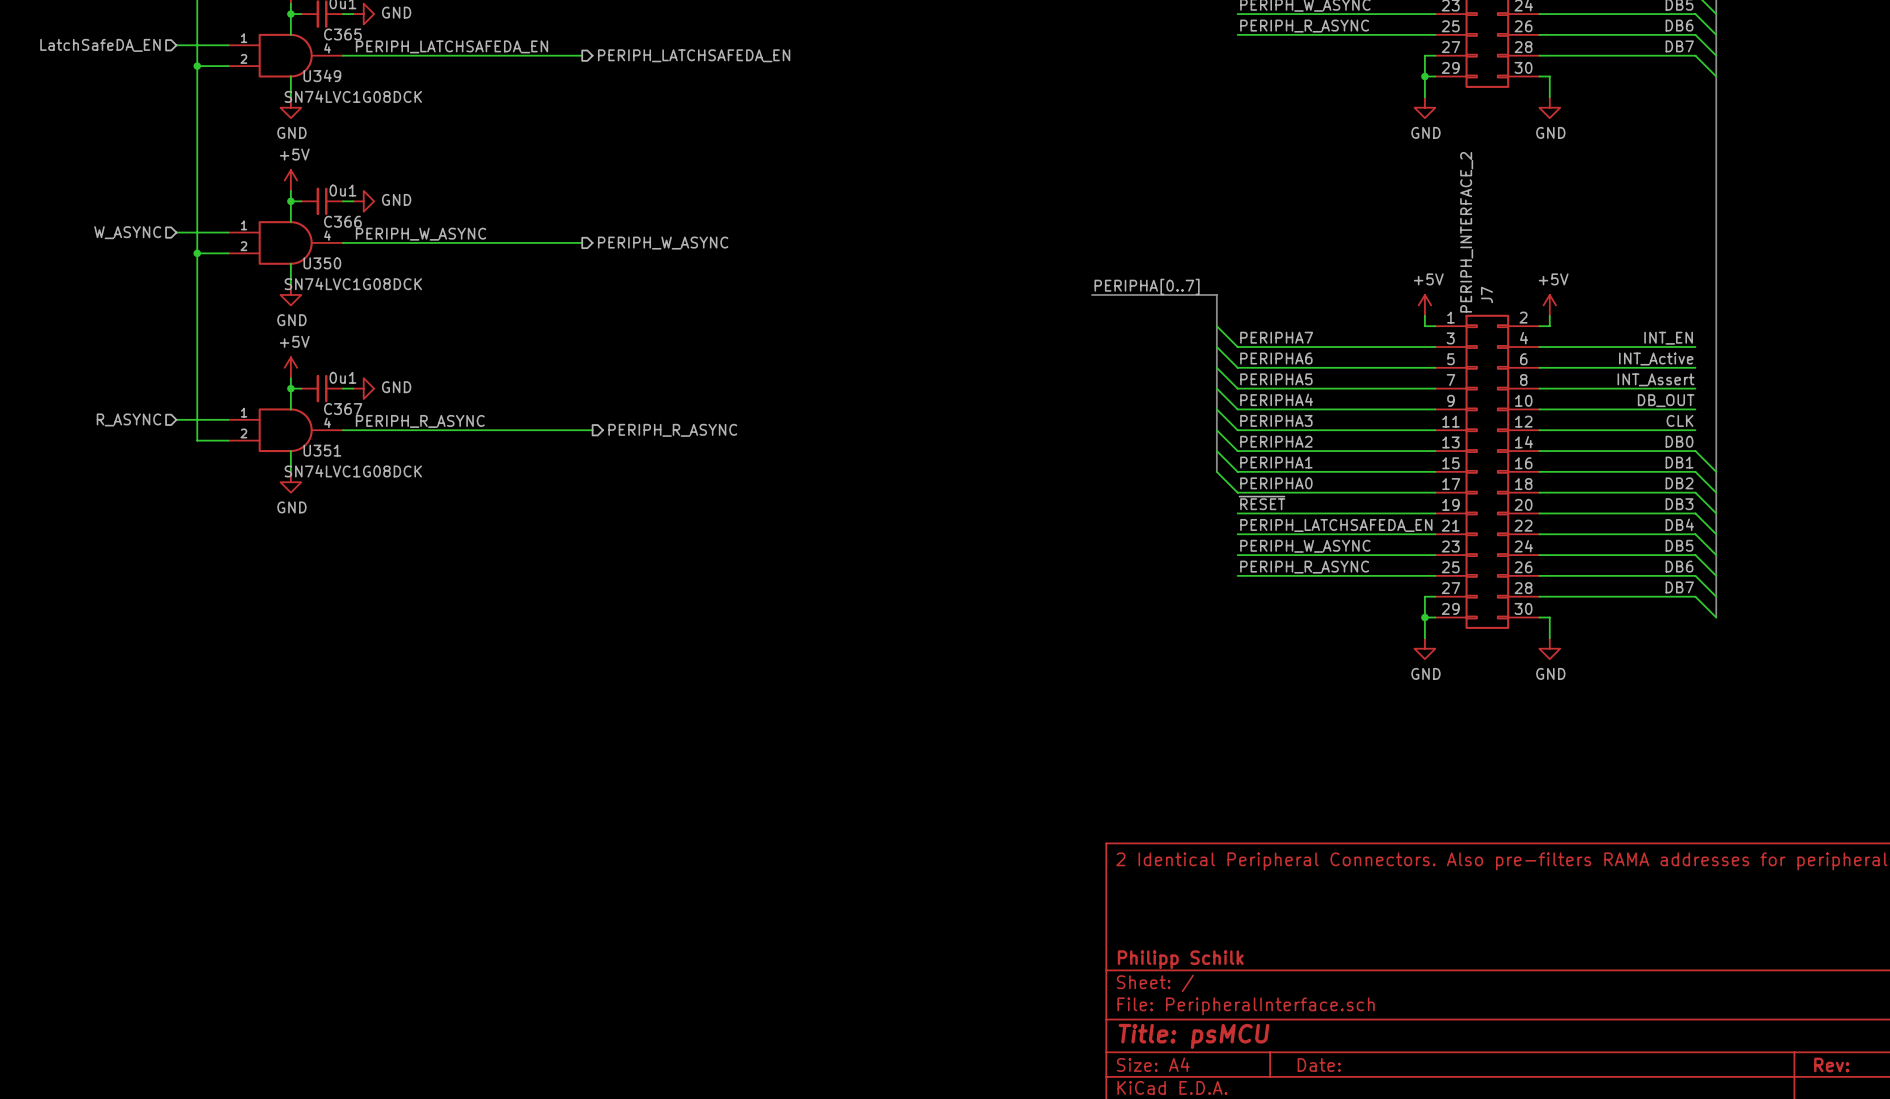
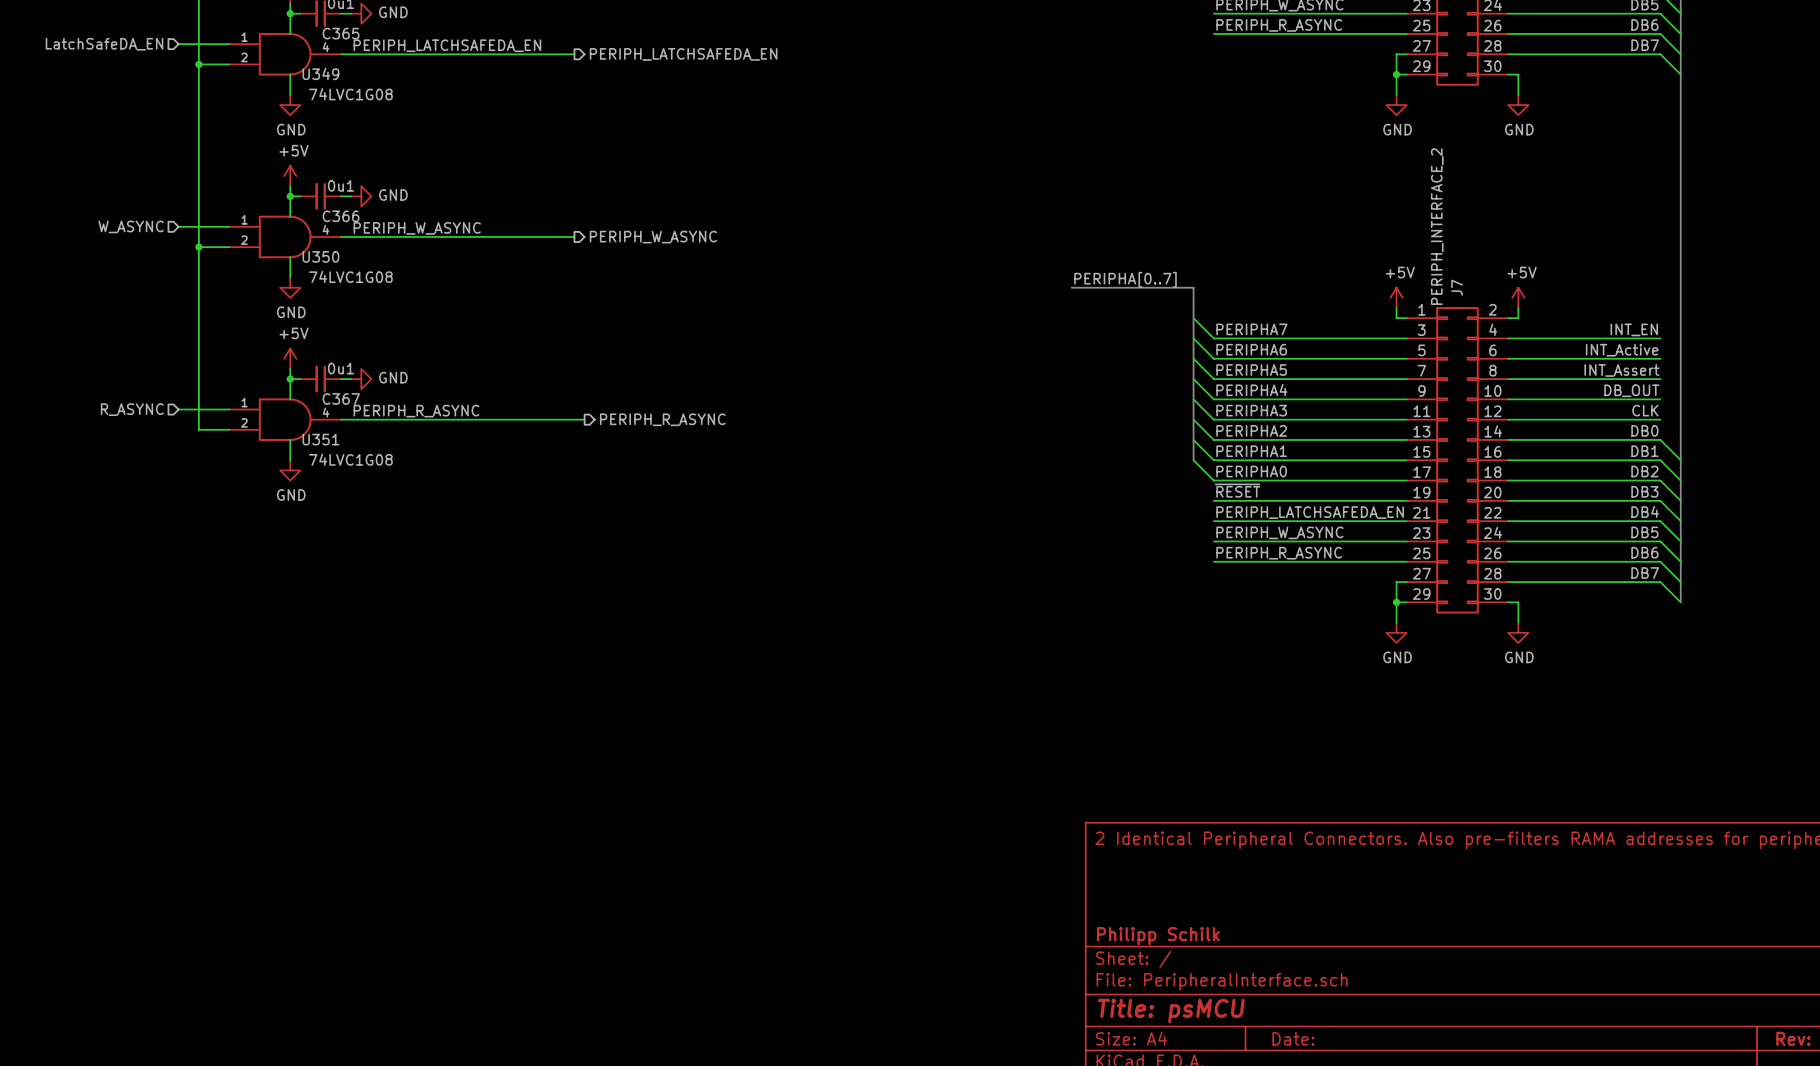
U349 value: SN74LVC1G08DCK (353, 96) -> 74LVC1G08 (350, 94)
U350 value: SN74LVC1G08DCK (353, 283) -> 74LVC1G08 (350, 276)
U351 value: SN74LVC1G08DCK (353, 471) -> 74LVC1G08 (350, 459)

